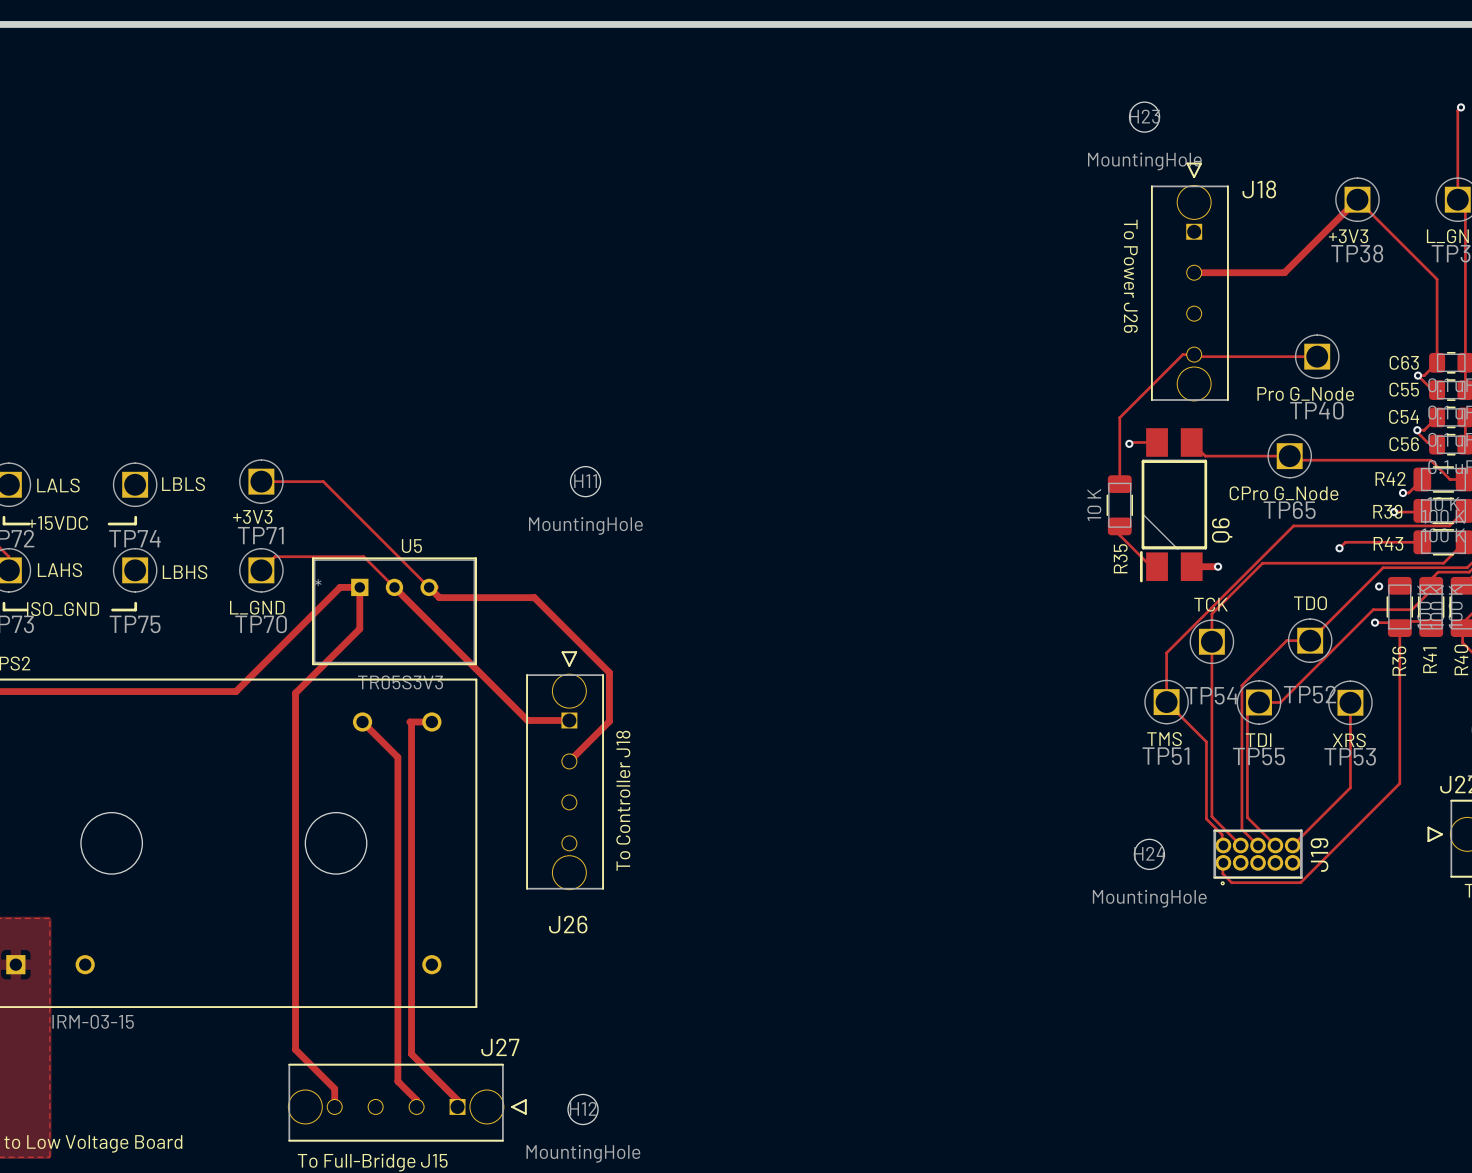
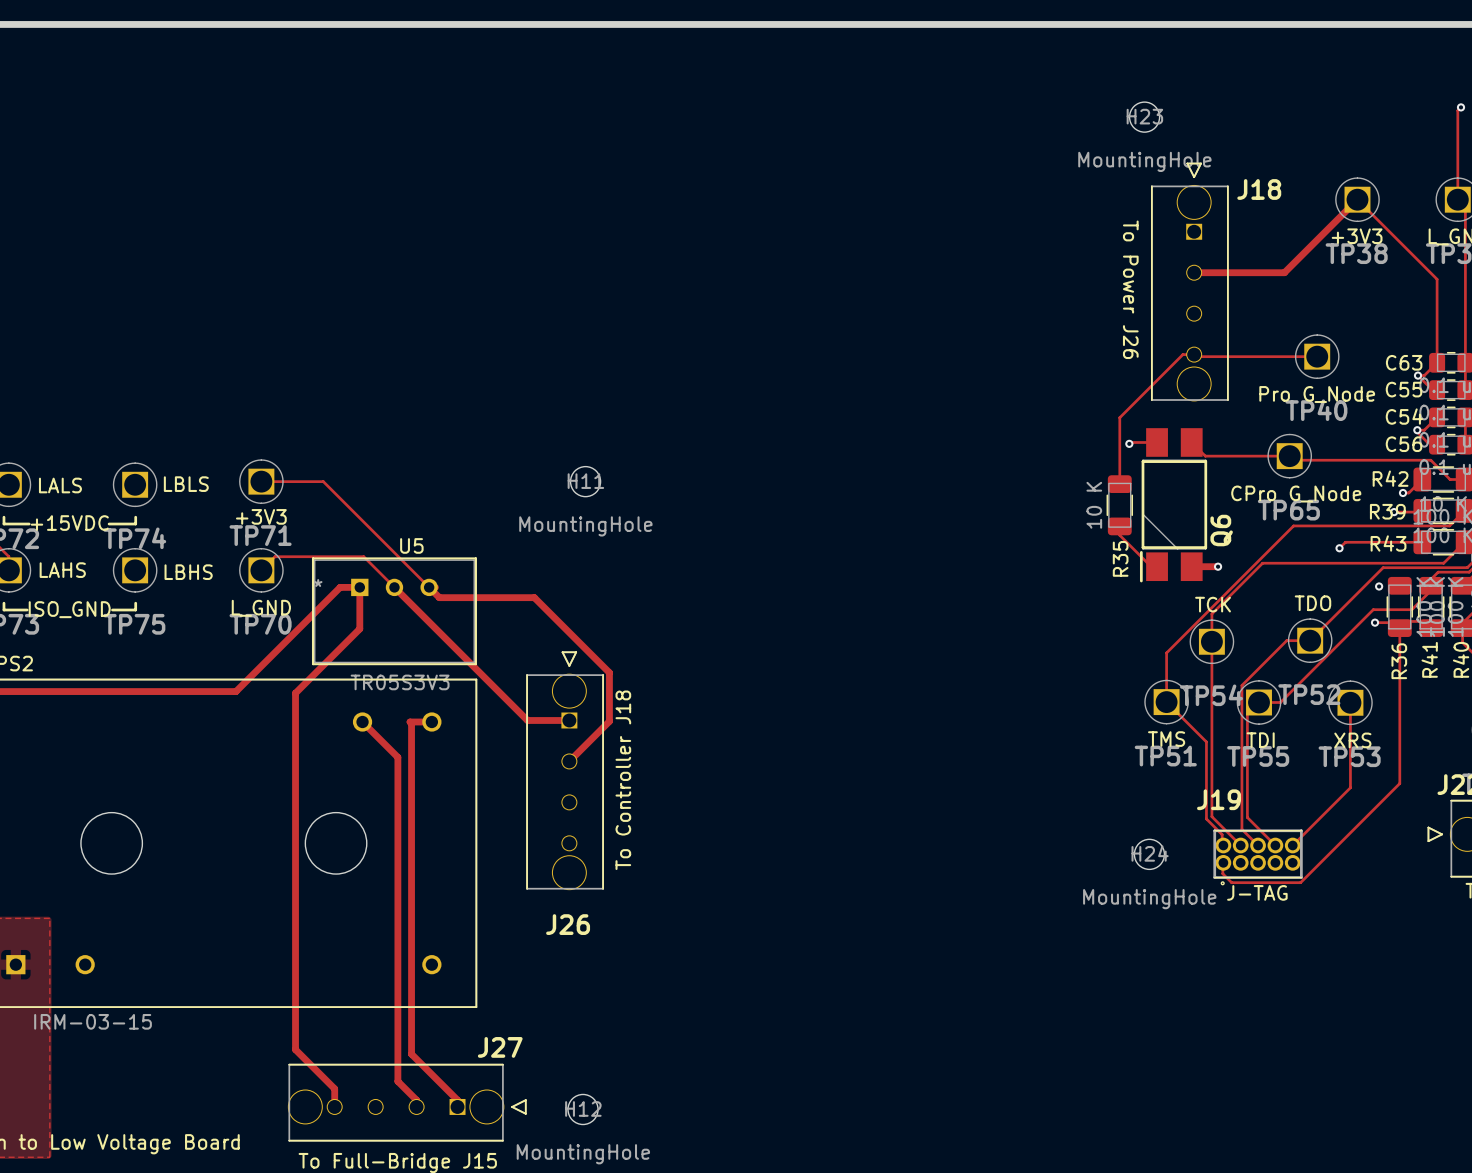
J19 name rotation: 0° (1319, 855) -> 90° clockwise (1219, 799)
J19 name position: J19 (1319, 855) -> J19 (1219, 799)
text: none -> J-TAG (1257, 892)

